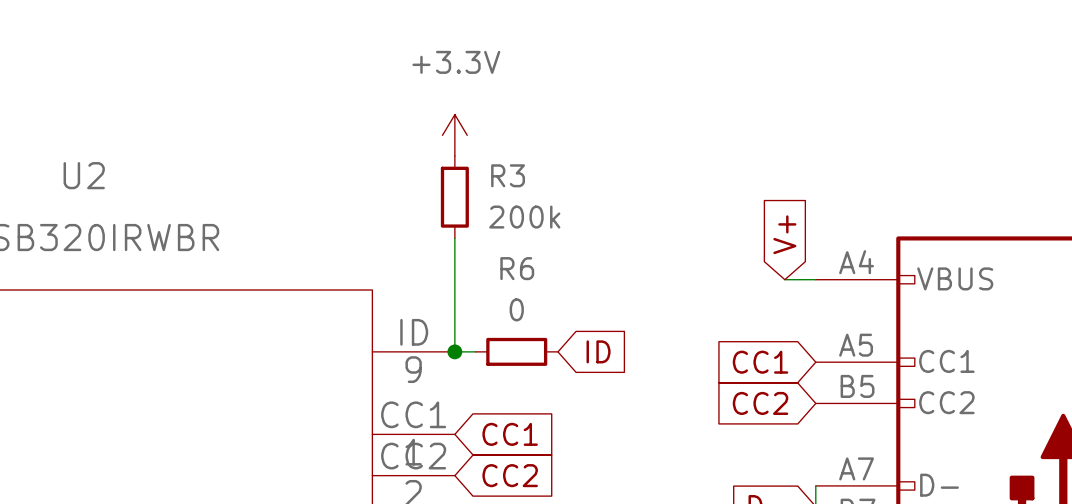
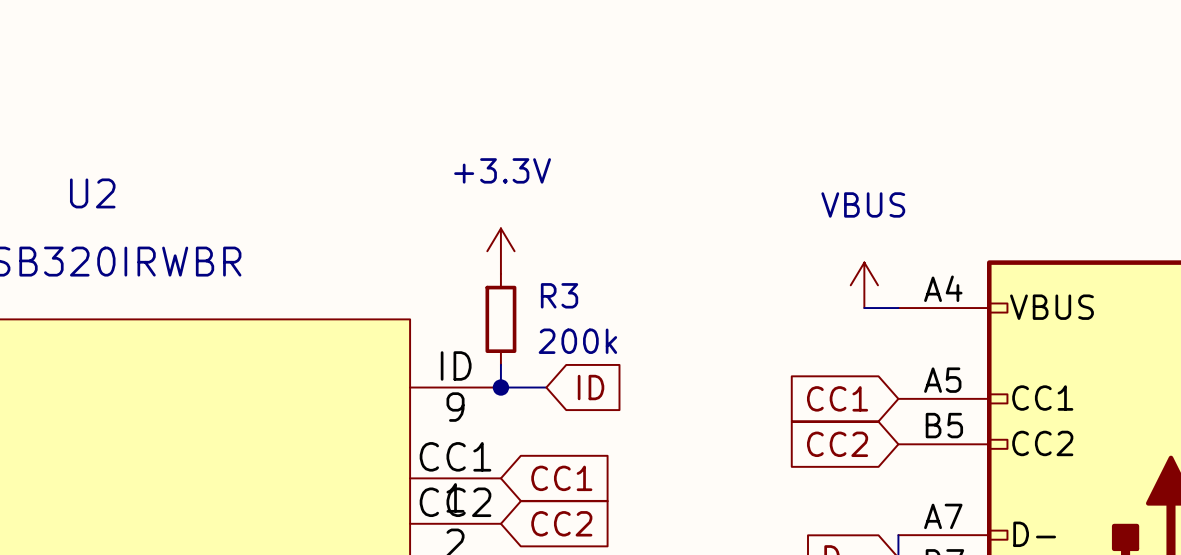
power symbol position: +3.3V (454, 135) -> +3.3V (500, 251)
R3 position: (454, 197) -> (500, 319)
global label: V+ (784, 234) -> none
wire: (454, 238) (454, 331) -> none
power symbol: none -> VBUS (864, 285)
R6: 0 (516, 351) -> none
global label position: ID (598, 351) -> ID (591, 387)

